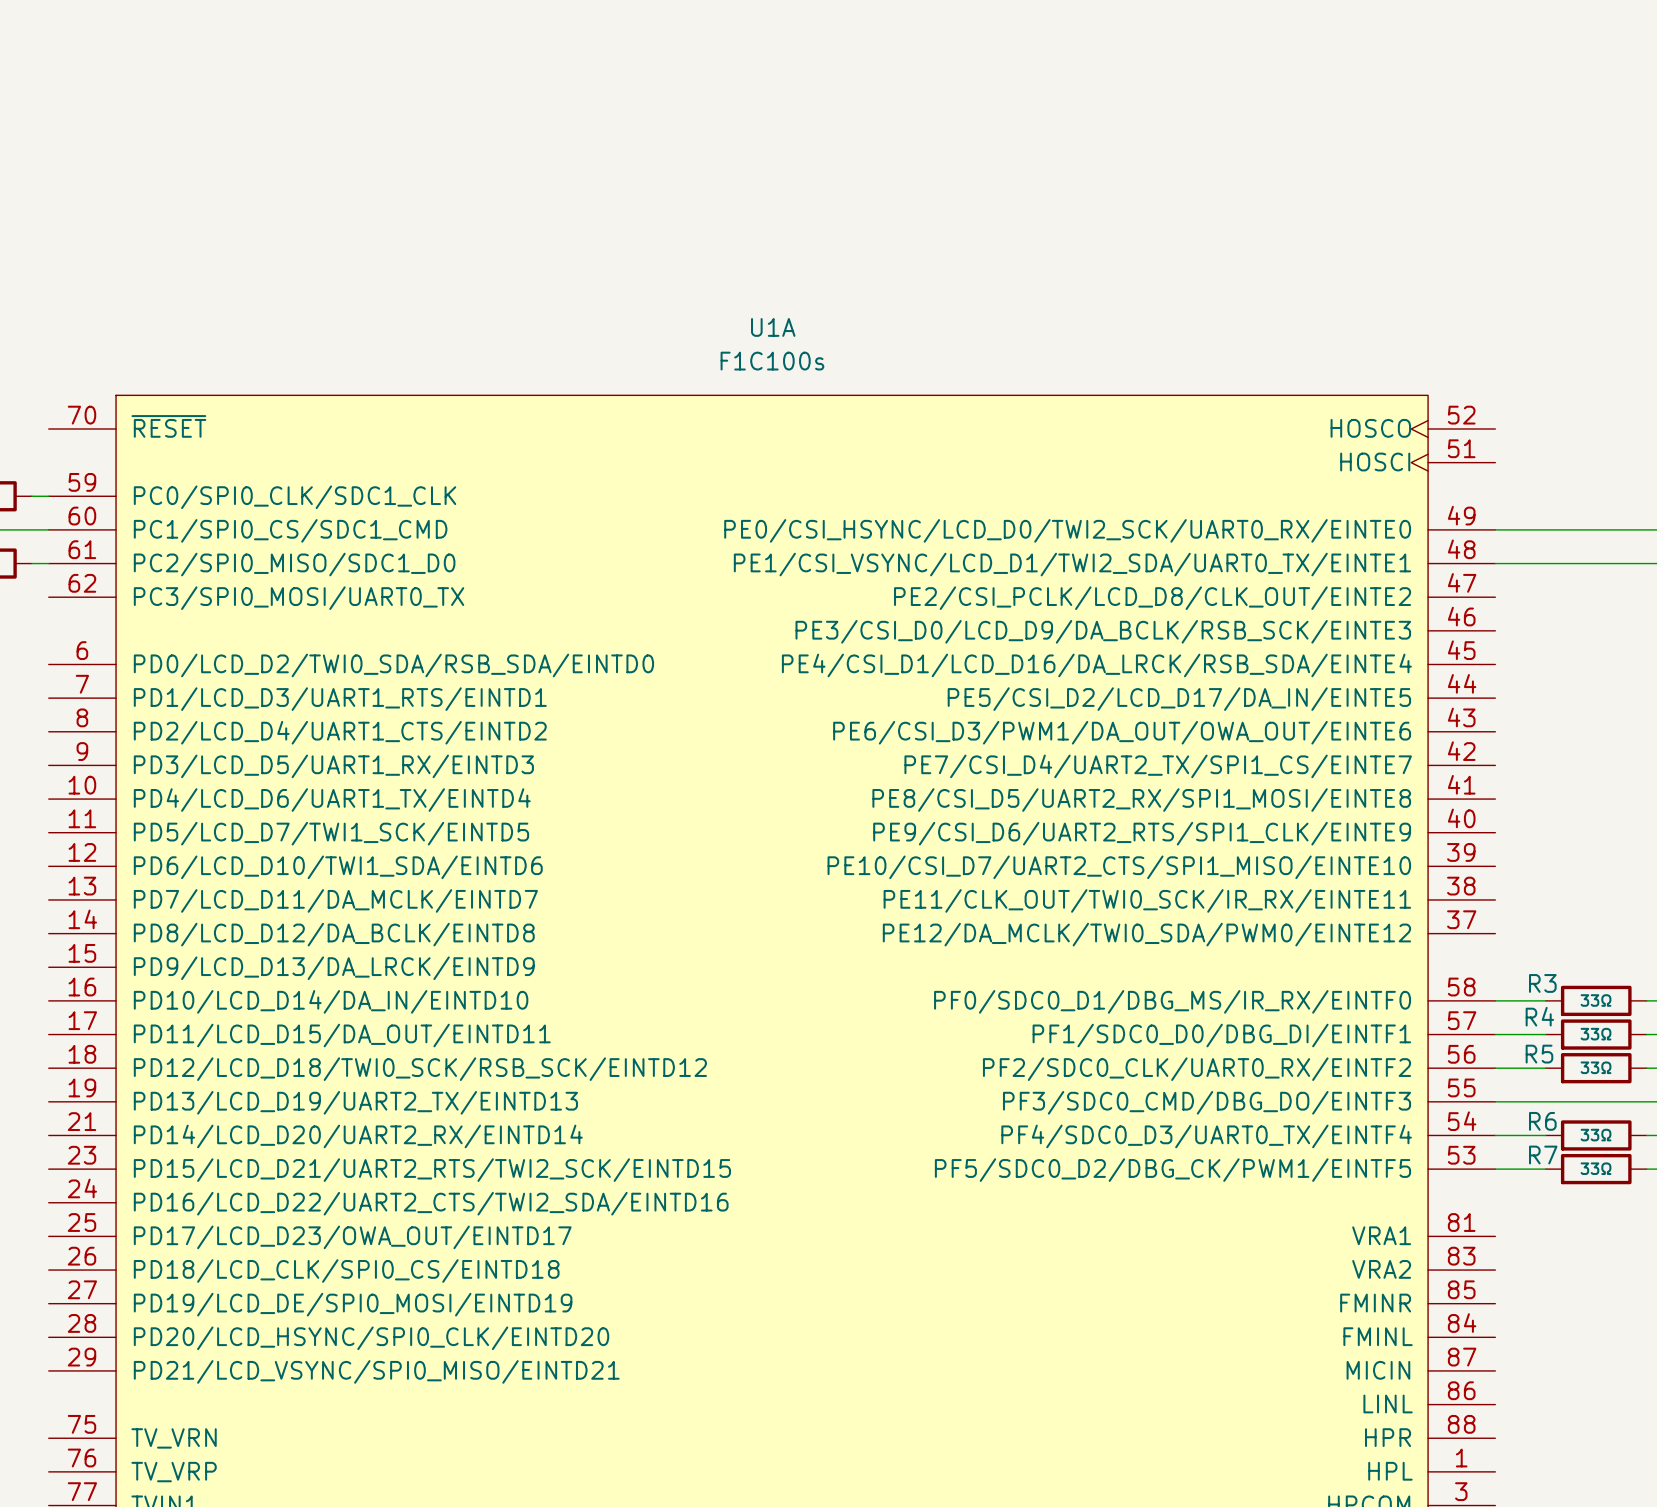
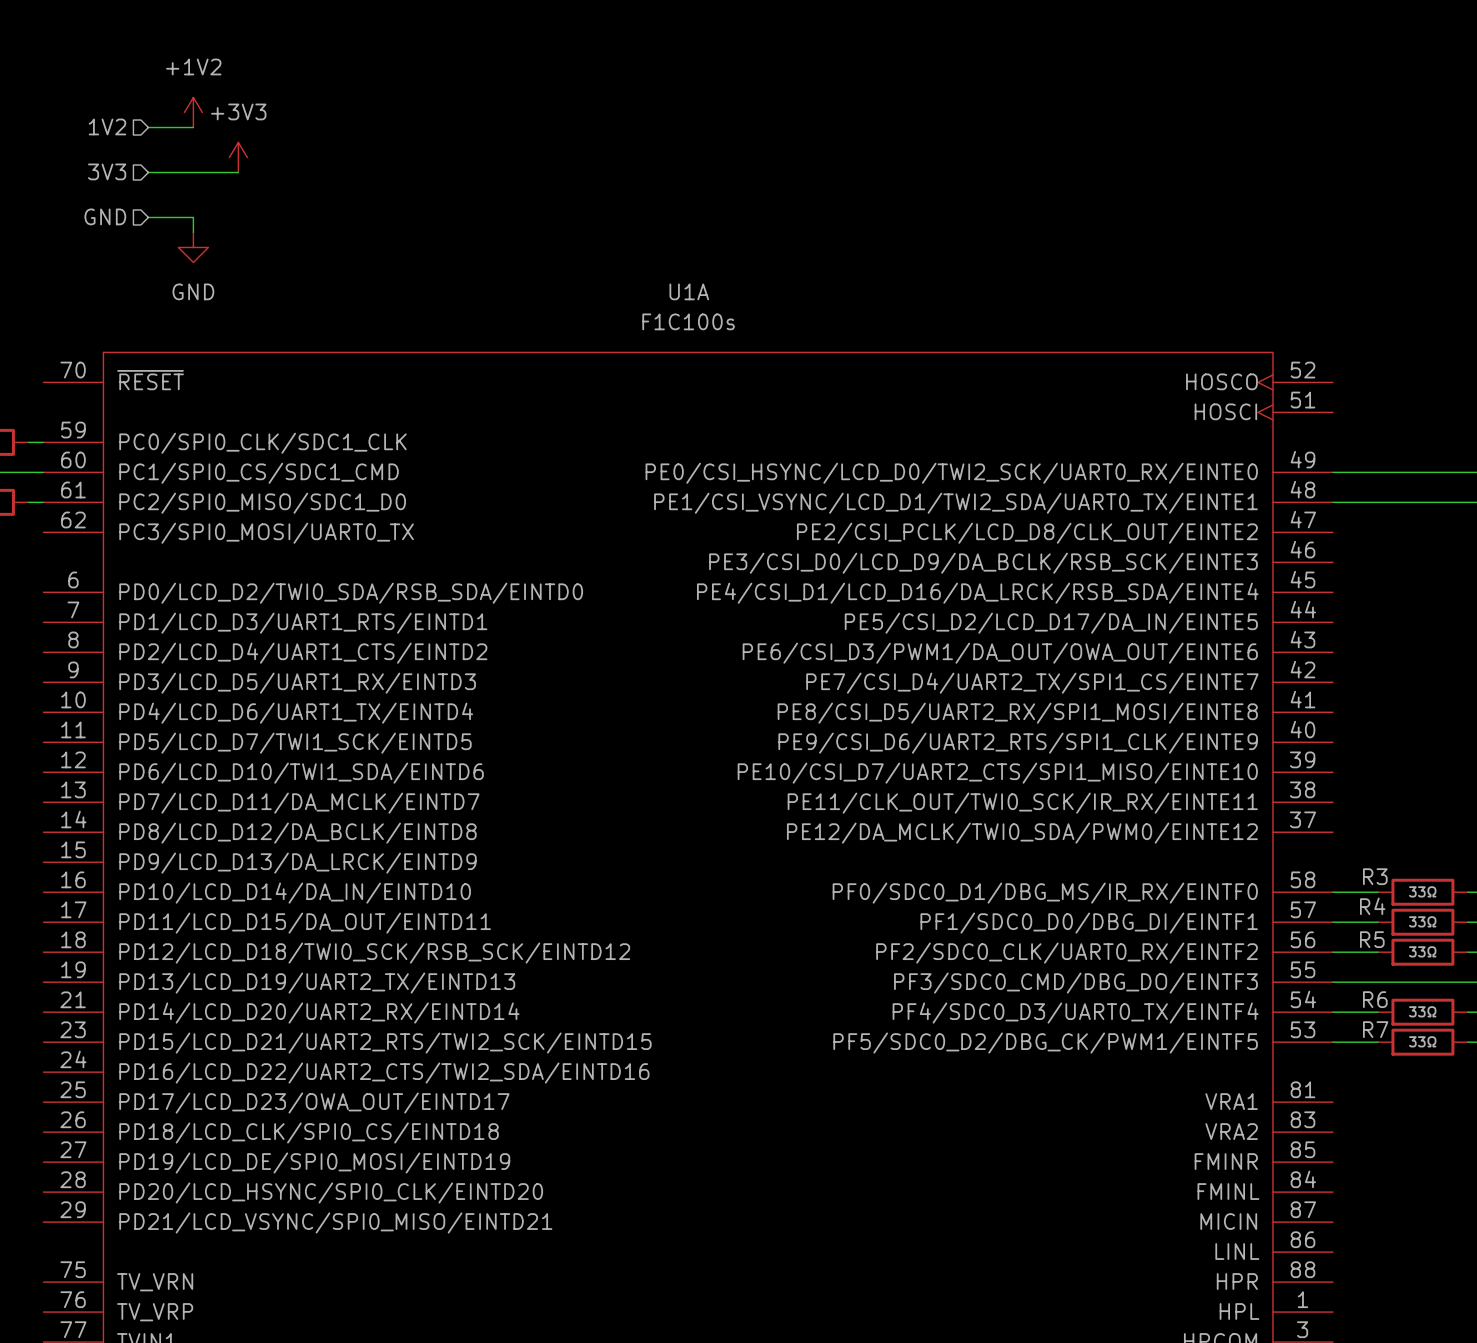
power symbol: none -> +1V2 (193, 112)
hierarchical label: none -> 1V2 (107, 126)
wire: none -> (148, 127) (193, 127)
power symbol: none -> +3V3 (238, 157)
hierarchical label: none -> 3V3 (107, 171)
wire: none -> (148, 172) (238, 172)
hierarchical label: none -> GND (105, 216)
wire: none -> (148, 217) (193, 217) (193, 232)
power symbol: none -> GND (193, 247)

